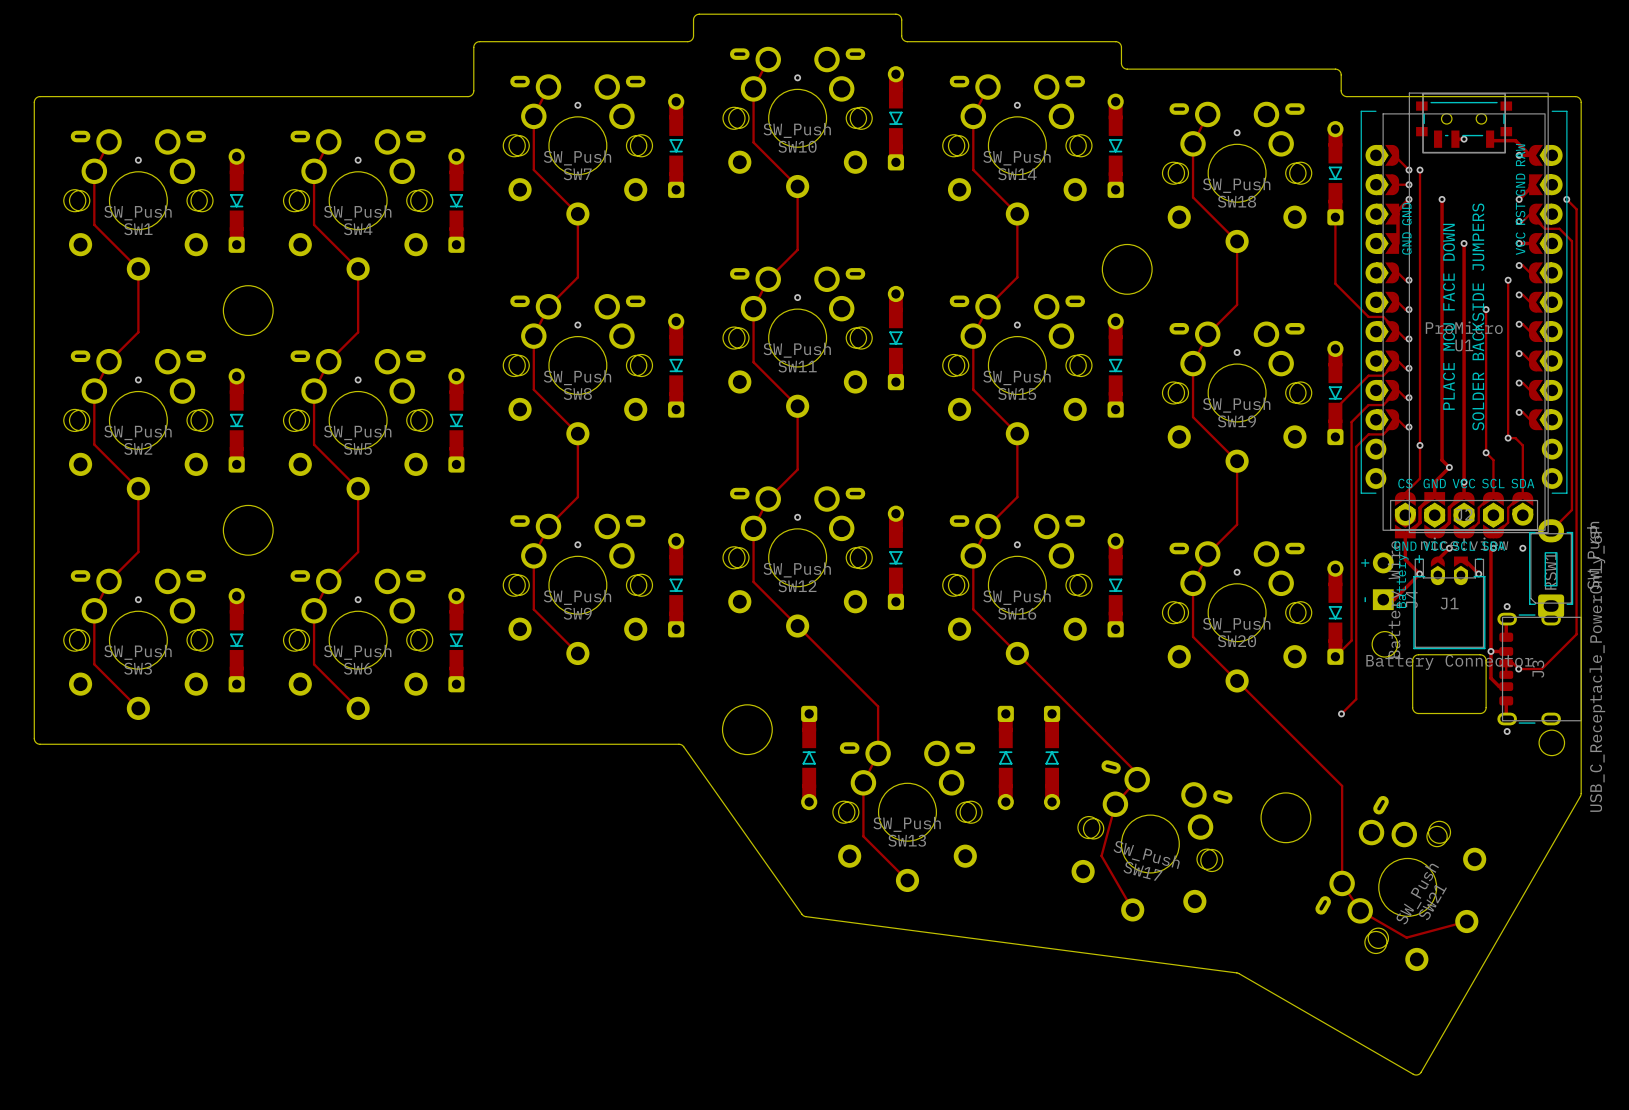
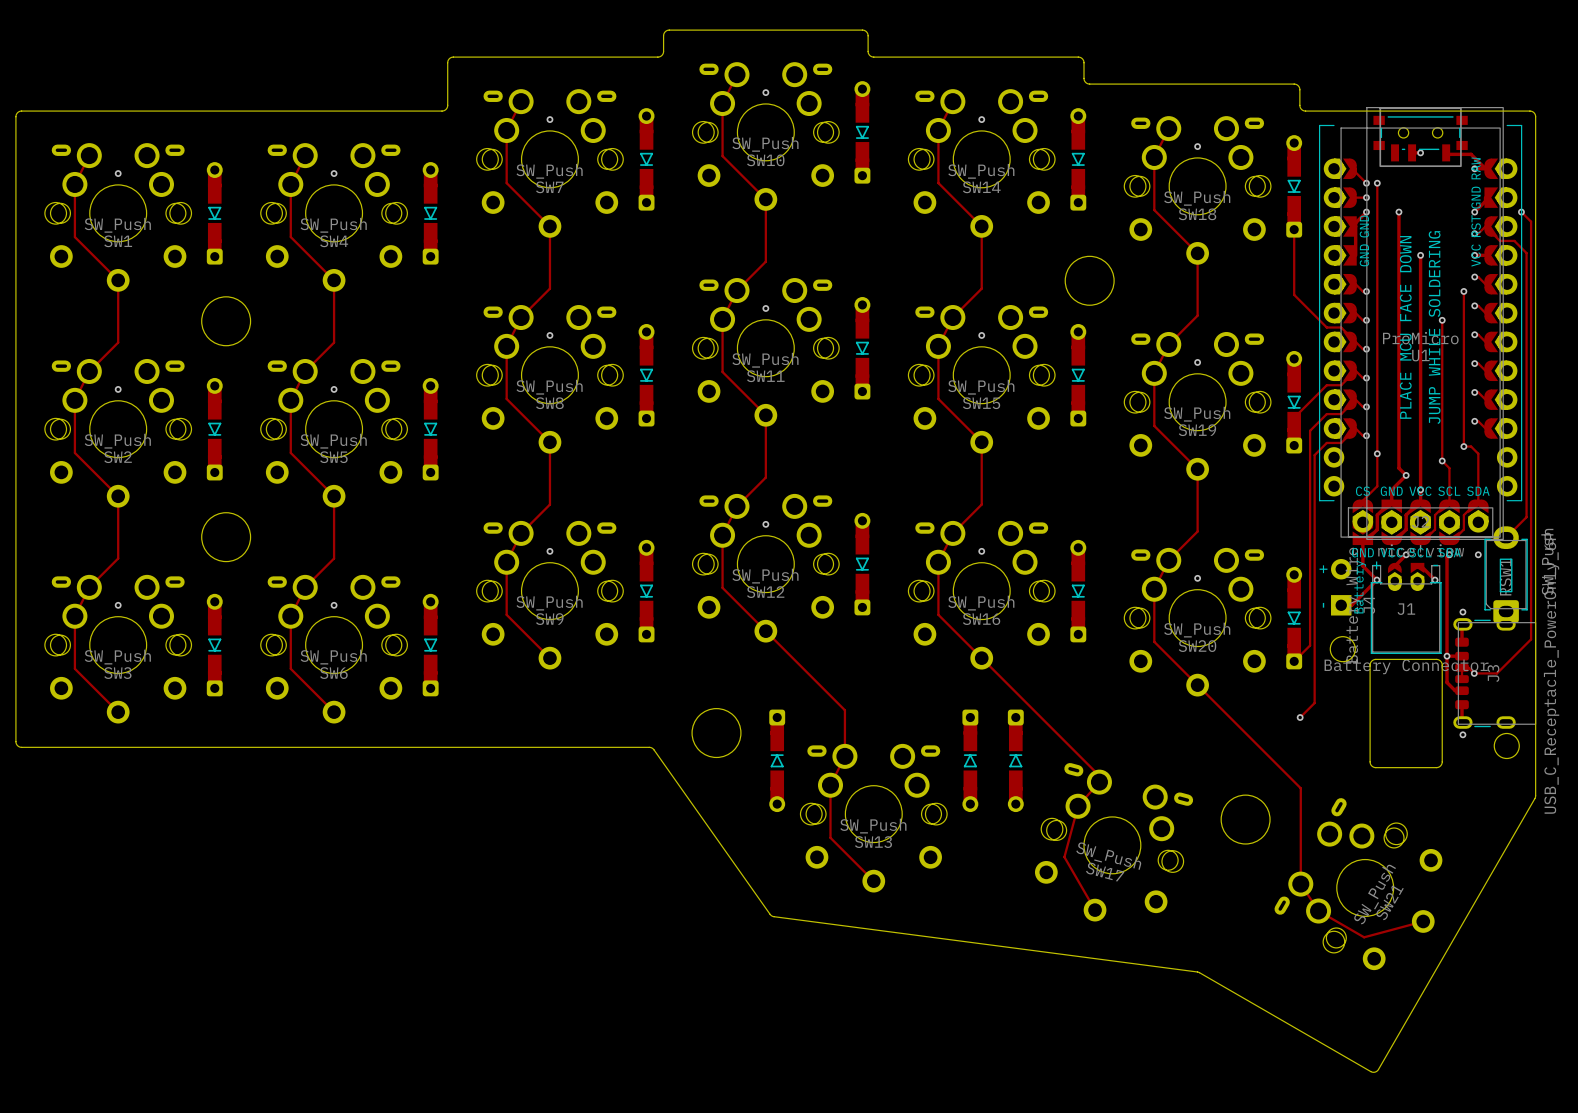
U1 text: SOLDER BACKSIDE JUMPERS (1478, 317) -> JUMP WHILE SOLDERING (1434, 327)
board edge: (1412, 707) (1414, 711) (1418, 713) (1481, 713) (1486, 707) -> (1370, 711) (1370, 762) (1375, 767) (1439, 766) (1442, 761) (1442, 711)

